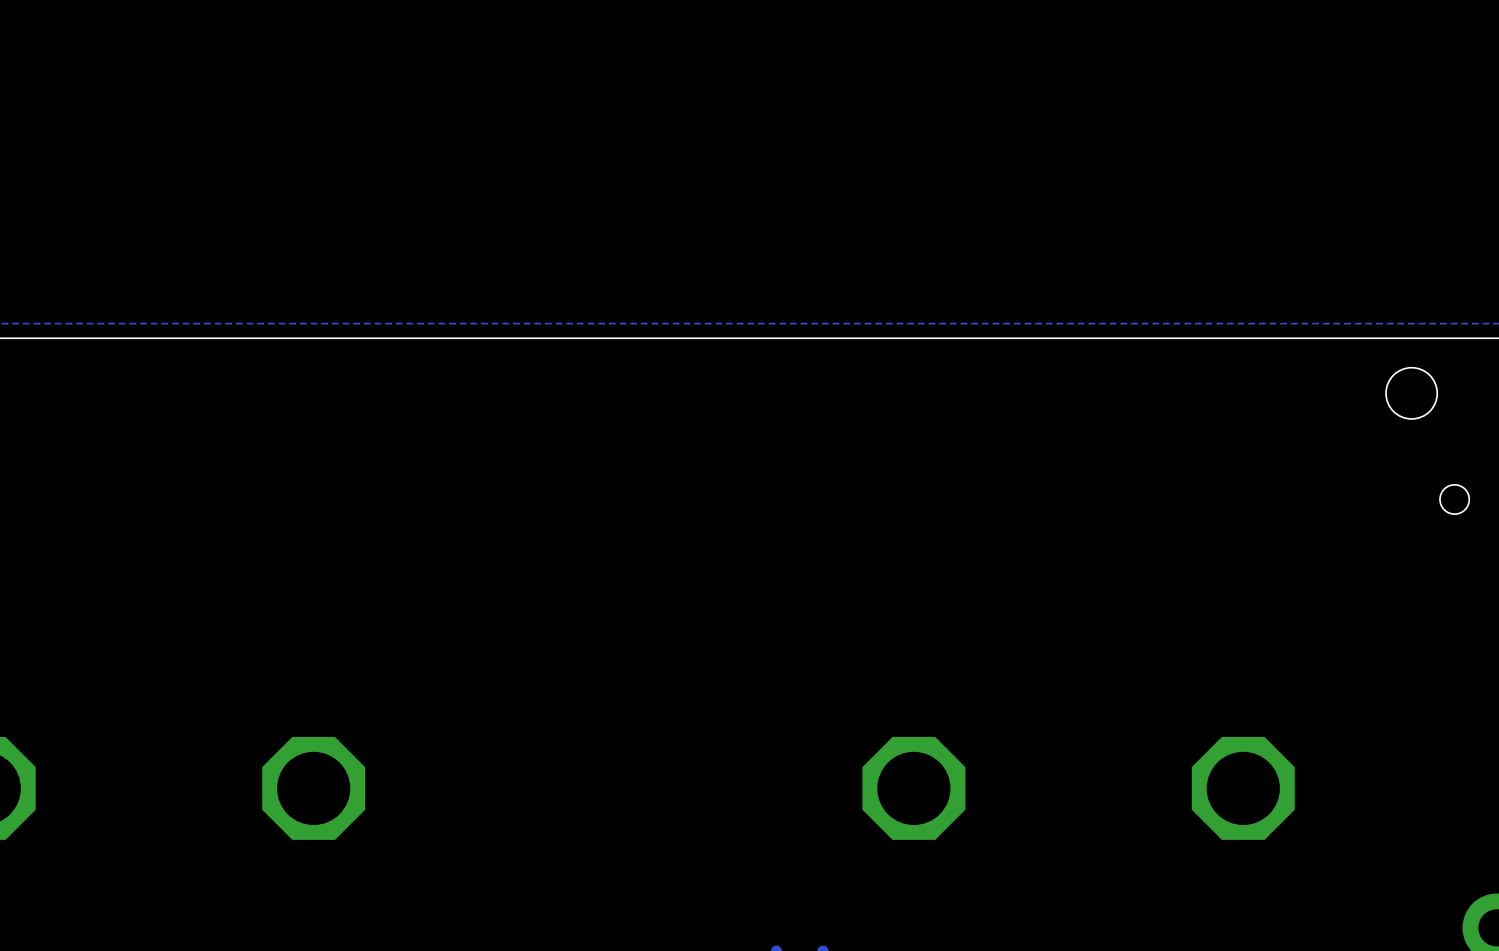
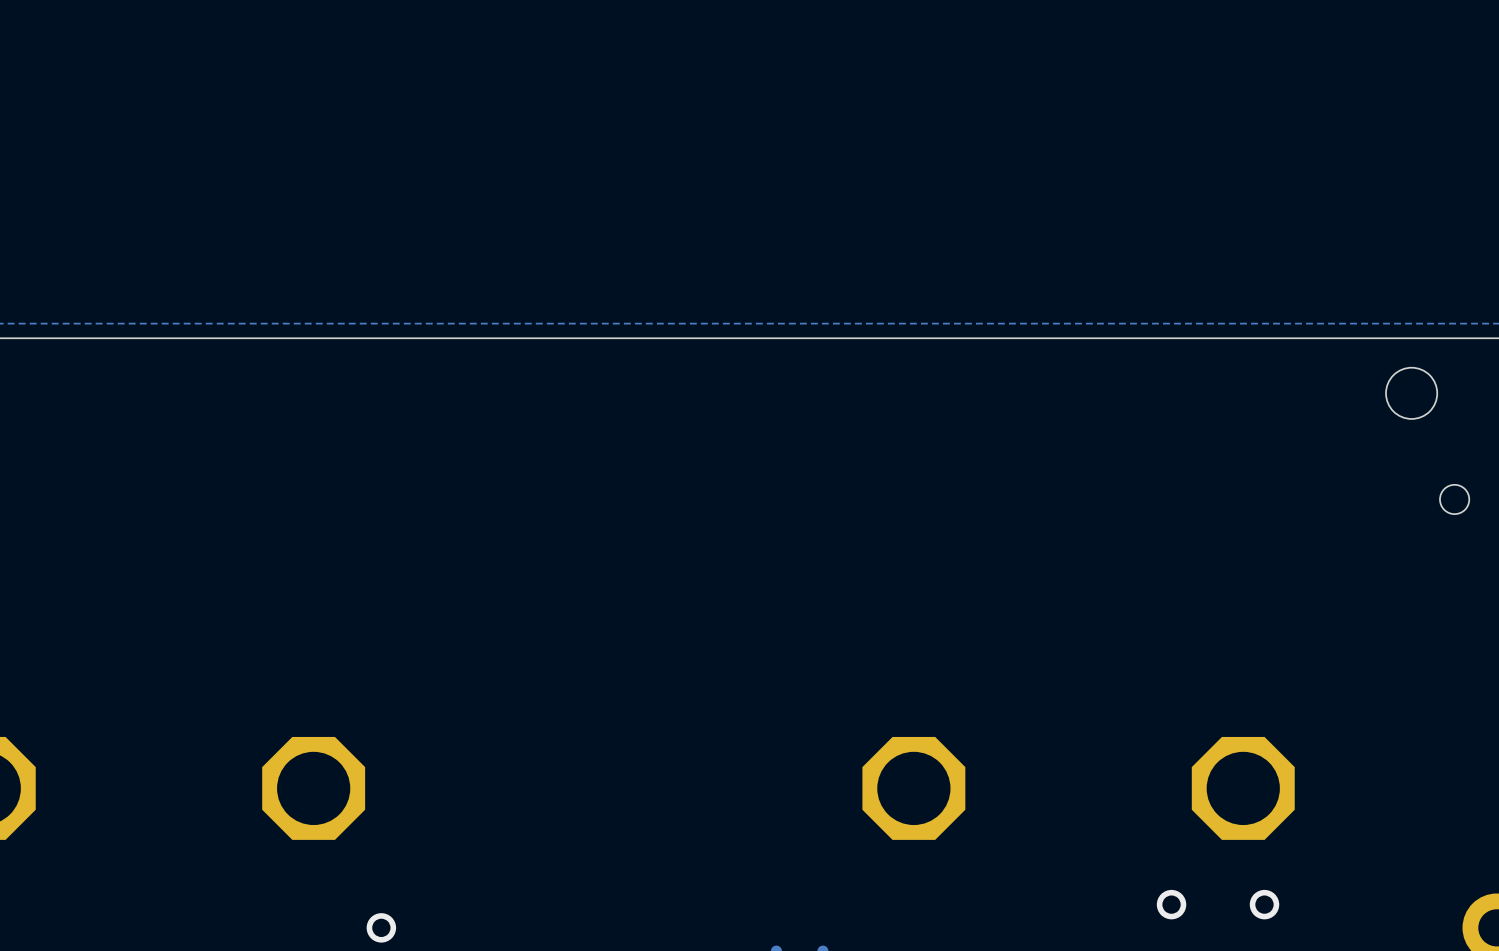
via: none -> (1171, 904)
via: none -> (1264, 904)
via: none -> (381, 927)

